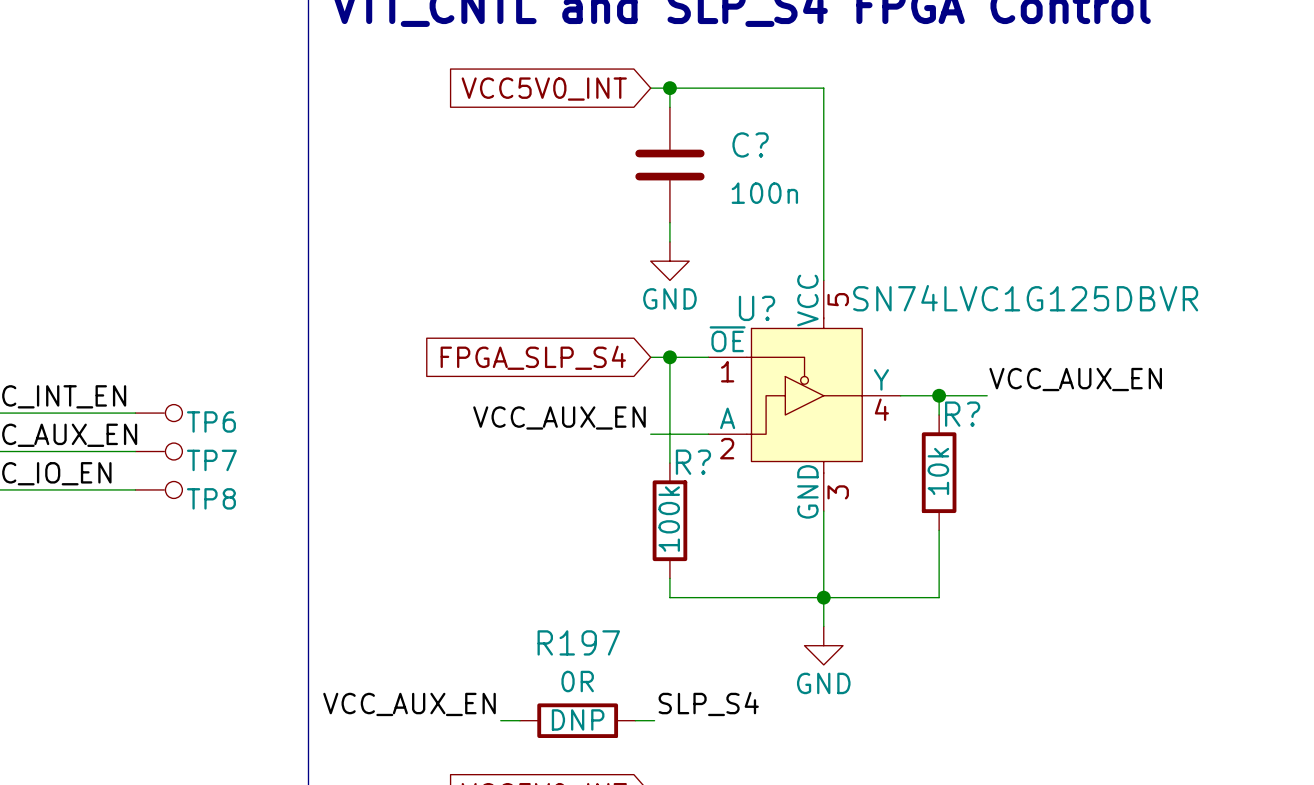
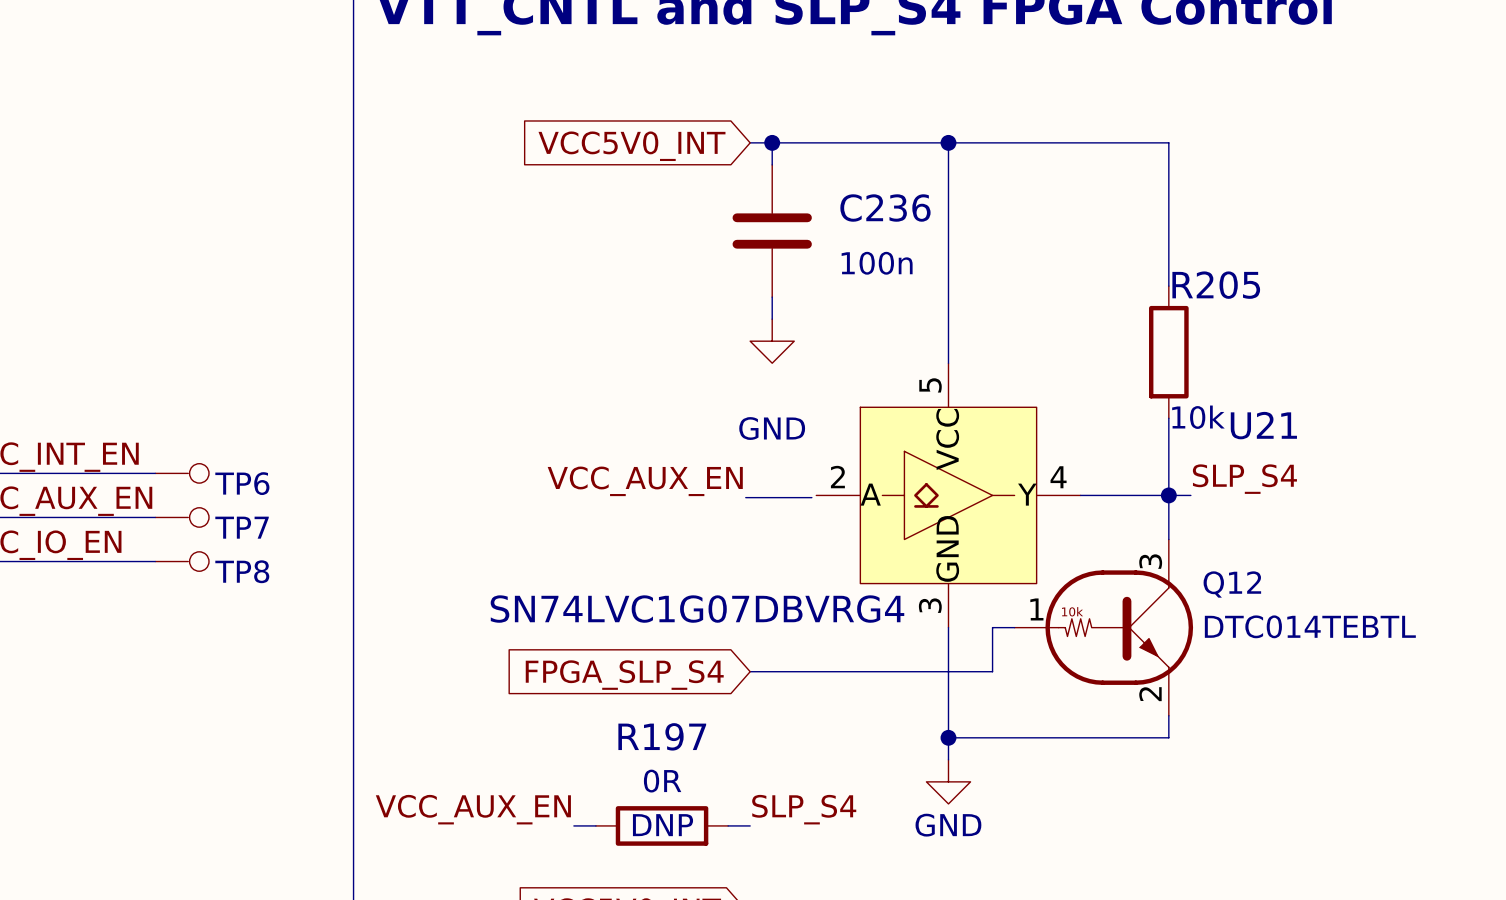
wire: (650, 88) (823, 88) (823, 280) -> none
wire: (669, 88) (669, 107) -> (772, 142) (772, 164)
junction position: (669, 88) -> (772, 142)
global label position: VCC5V0_INT (544, 89) -> VCC5V0_INT (631, 146)
wire: none -> (750, 142) (1168, 142) (1168, 286)
wire: none -> (948, 142) (948, 363)
junction: none -> (948, 142)
C?: (669, 165) -> none
C236: none -> (772, 231)
wire: (669, 222) (669, 241) -> (772, 297) (772, 319)
power symbol position: GND (669, 261) -> GND (772, 341)
power symbol text position: GND (669, 298) -> GND (772, 428)
R205: none -> (1168, 352)
global label position: FPGA_SLP_S4 (533, 357) -> FPGA_SLP_S4 (624, 675)
wire: (650, 357) (708, 357) -> none
wire: (669, 357) (669, 463) -> (1168, 418) (1168, 539)
junction: (669, 357) -> none
label: VCC_AUX_EN (1075, 379) -> none
U?: SN74LVC1G125DBVR (804, 395) -> none
wire: (900, 395) (987, 395) -> none
wire: (939, 395) (939, 414) -> none
junction position: (939, 395) -> (1168, 495)
label: none -> SLP_S4 (1244, 479)
U21: none -> SN74LVC1G07DBVRG4 (948, 495)
wire: none -> (1080, 495) (1190, 495)
R?: (939, 472) -> none
wire: (823, 511) (823, 626) -> (948, 627) (948, 759)
R?: (669, 520) -> none
wire: (939, 530) (939, 597) (669, 597) (669, 578) -> none
wire: none -> (1014, 627) (992, 627) (992, 671) (750, 671)
Q12: none -> DTC014TEBTL (1103, 627)
junction position: (823, 597) -> (948, 737)
wire: none -> (1168, 715) (1168, 737) (948, 737)
power symbol position: GND (823, 645) -> GND (948, 781)

